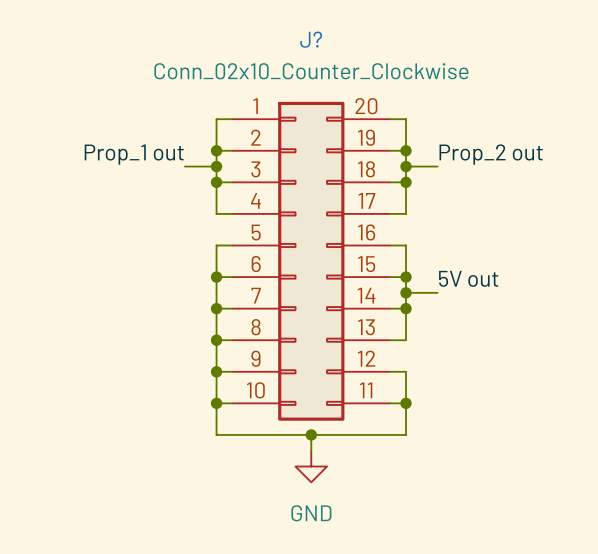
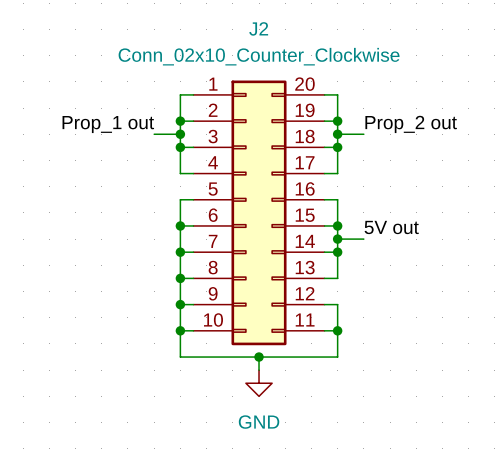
J? name: J? (311, 39) -> J2 (258, 28)

